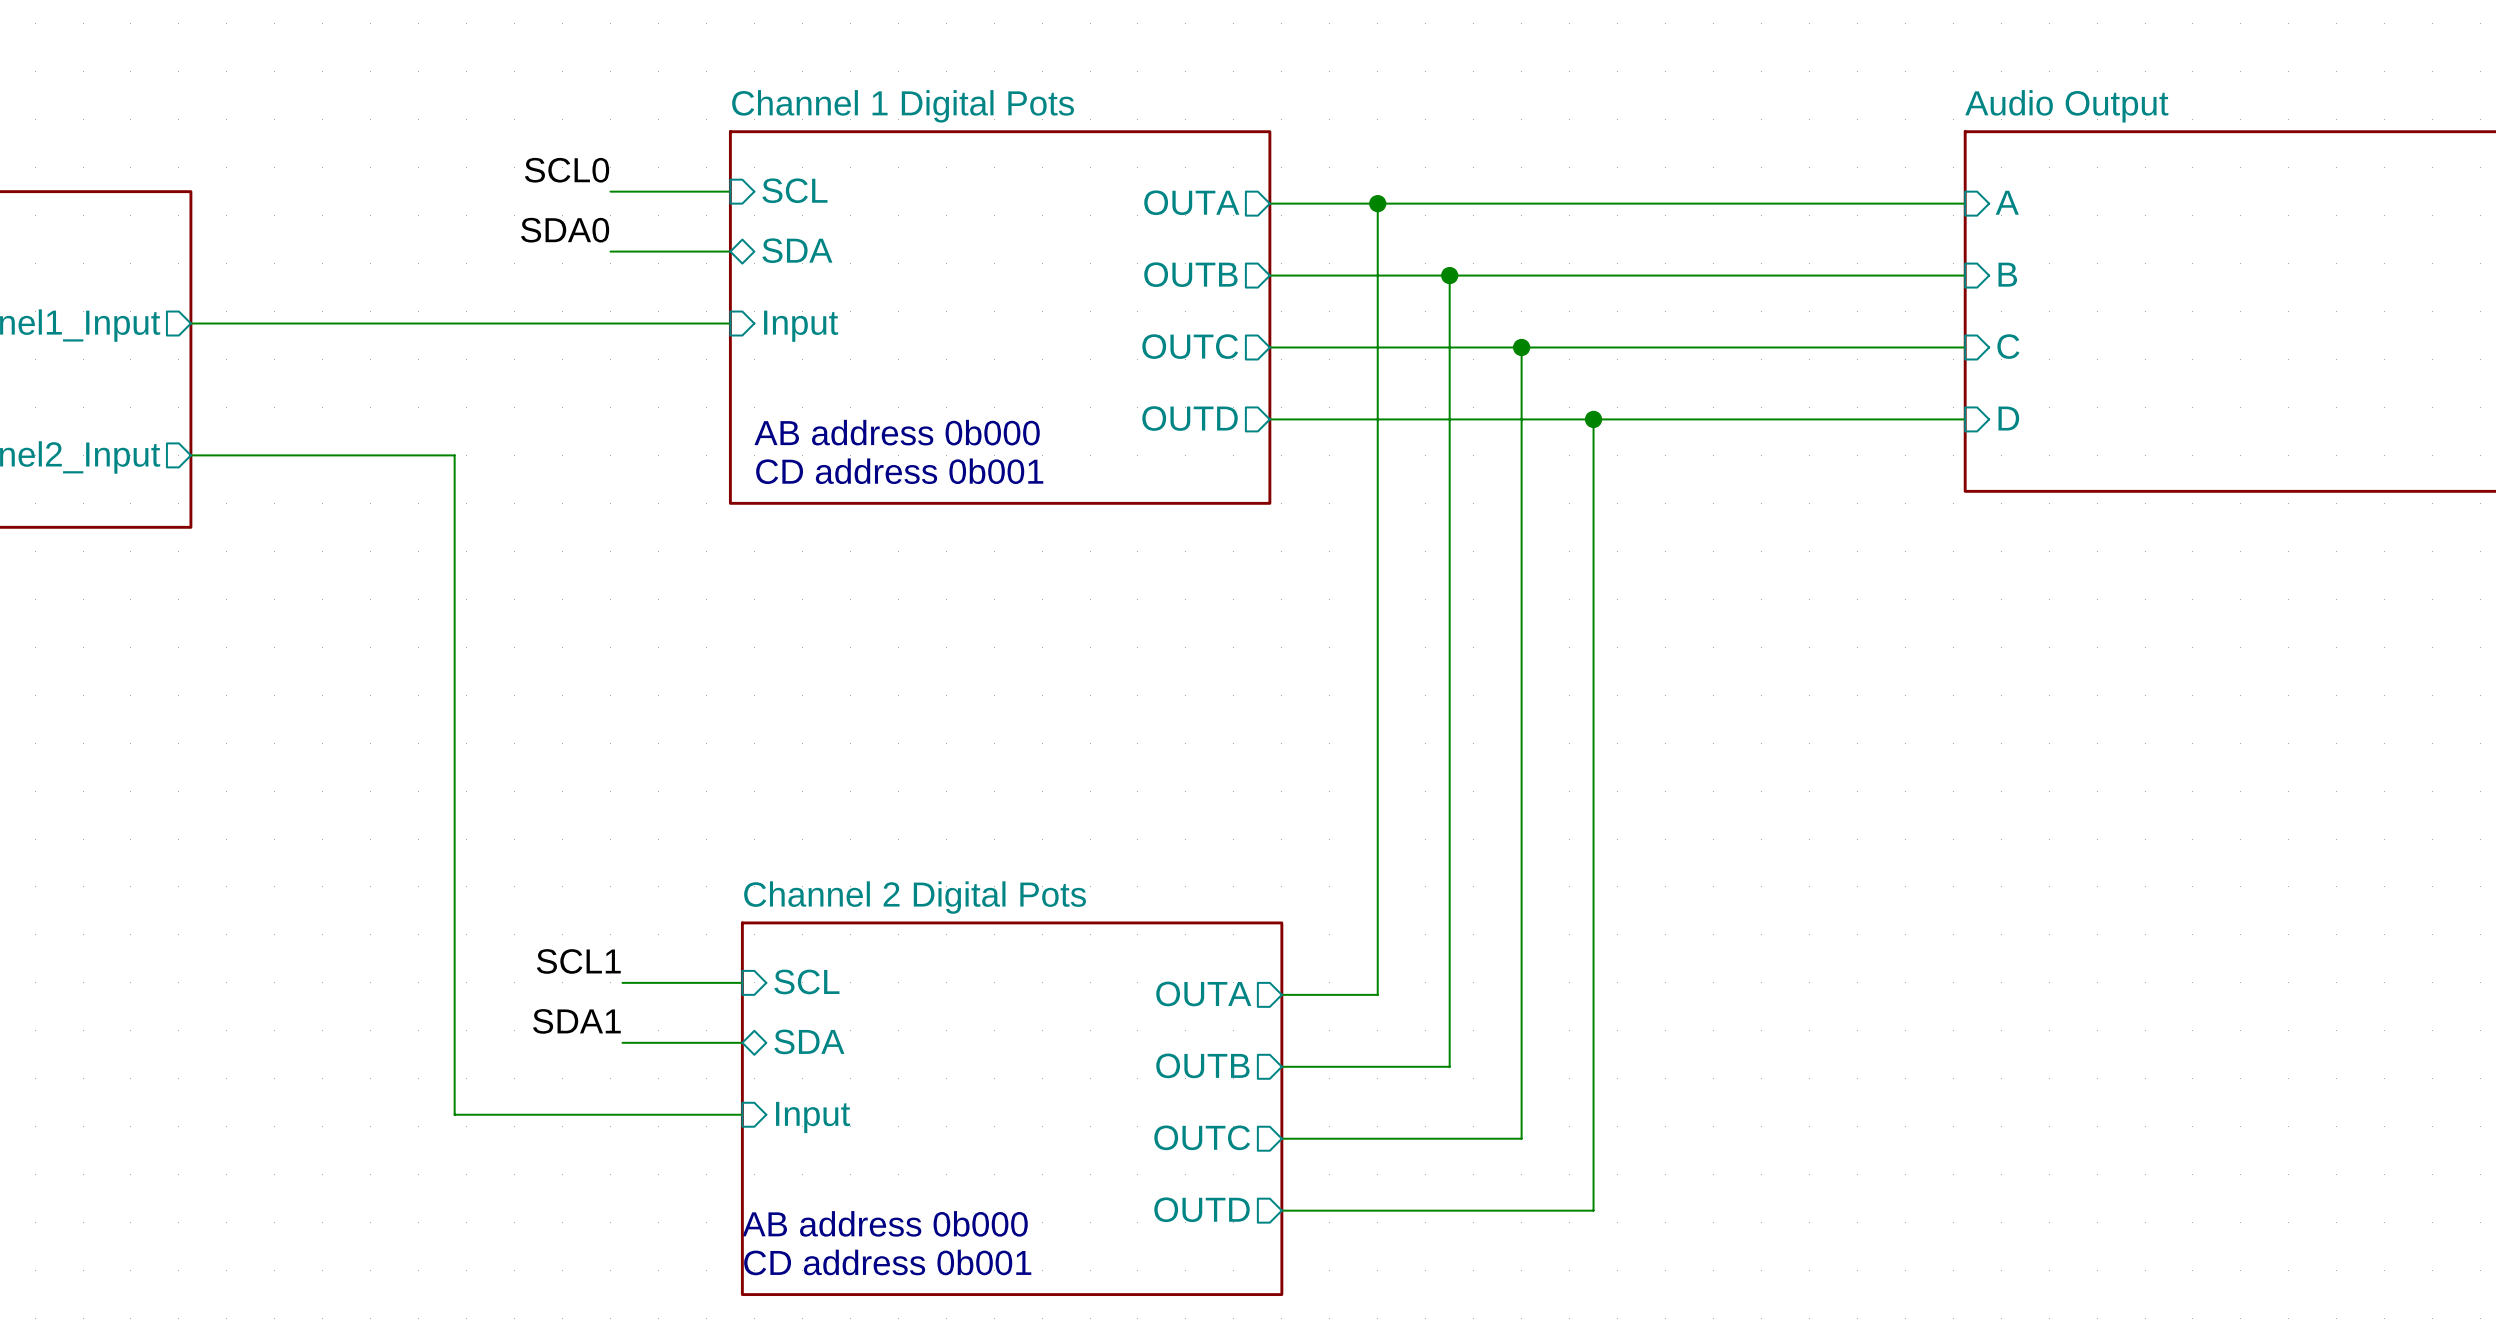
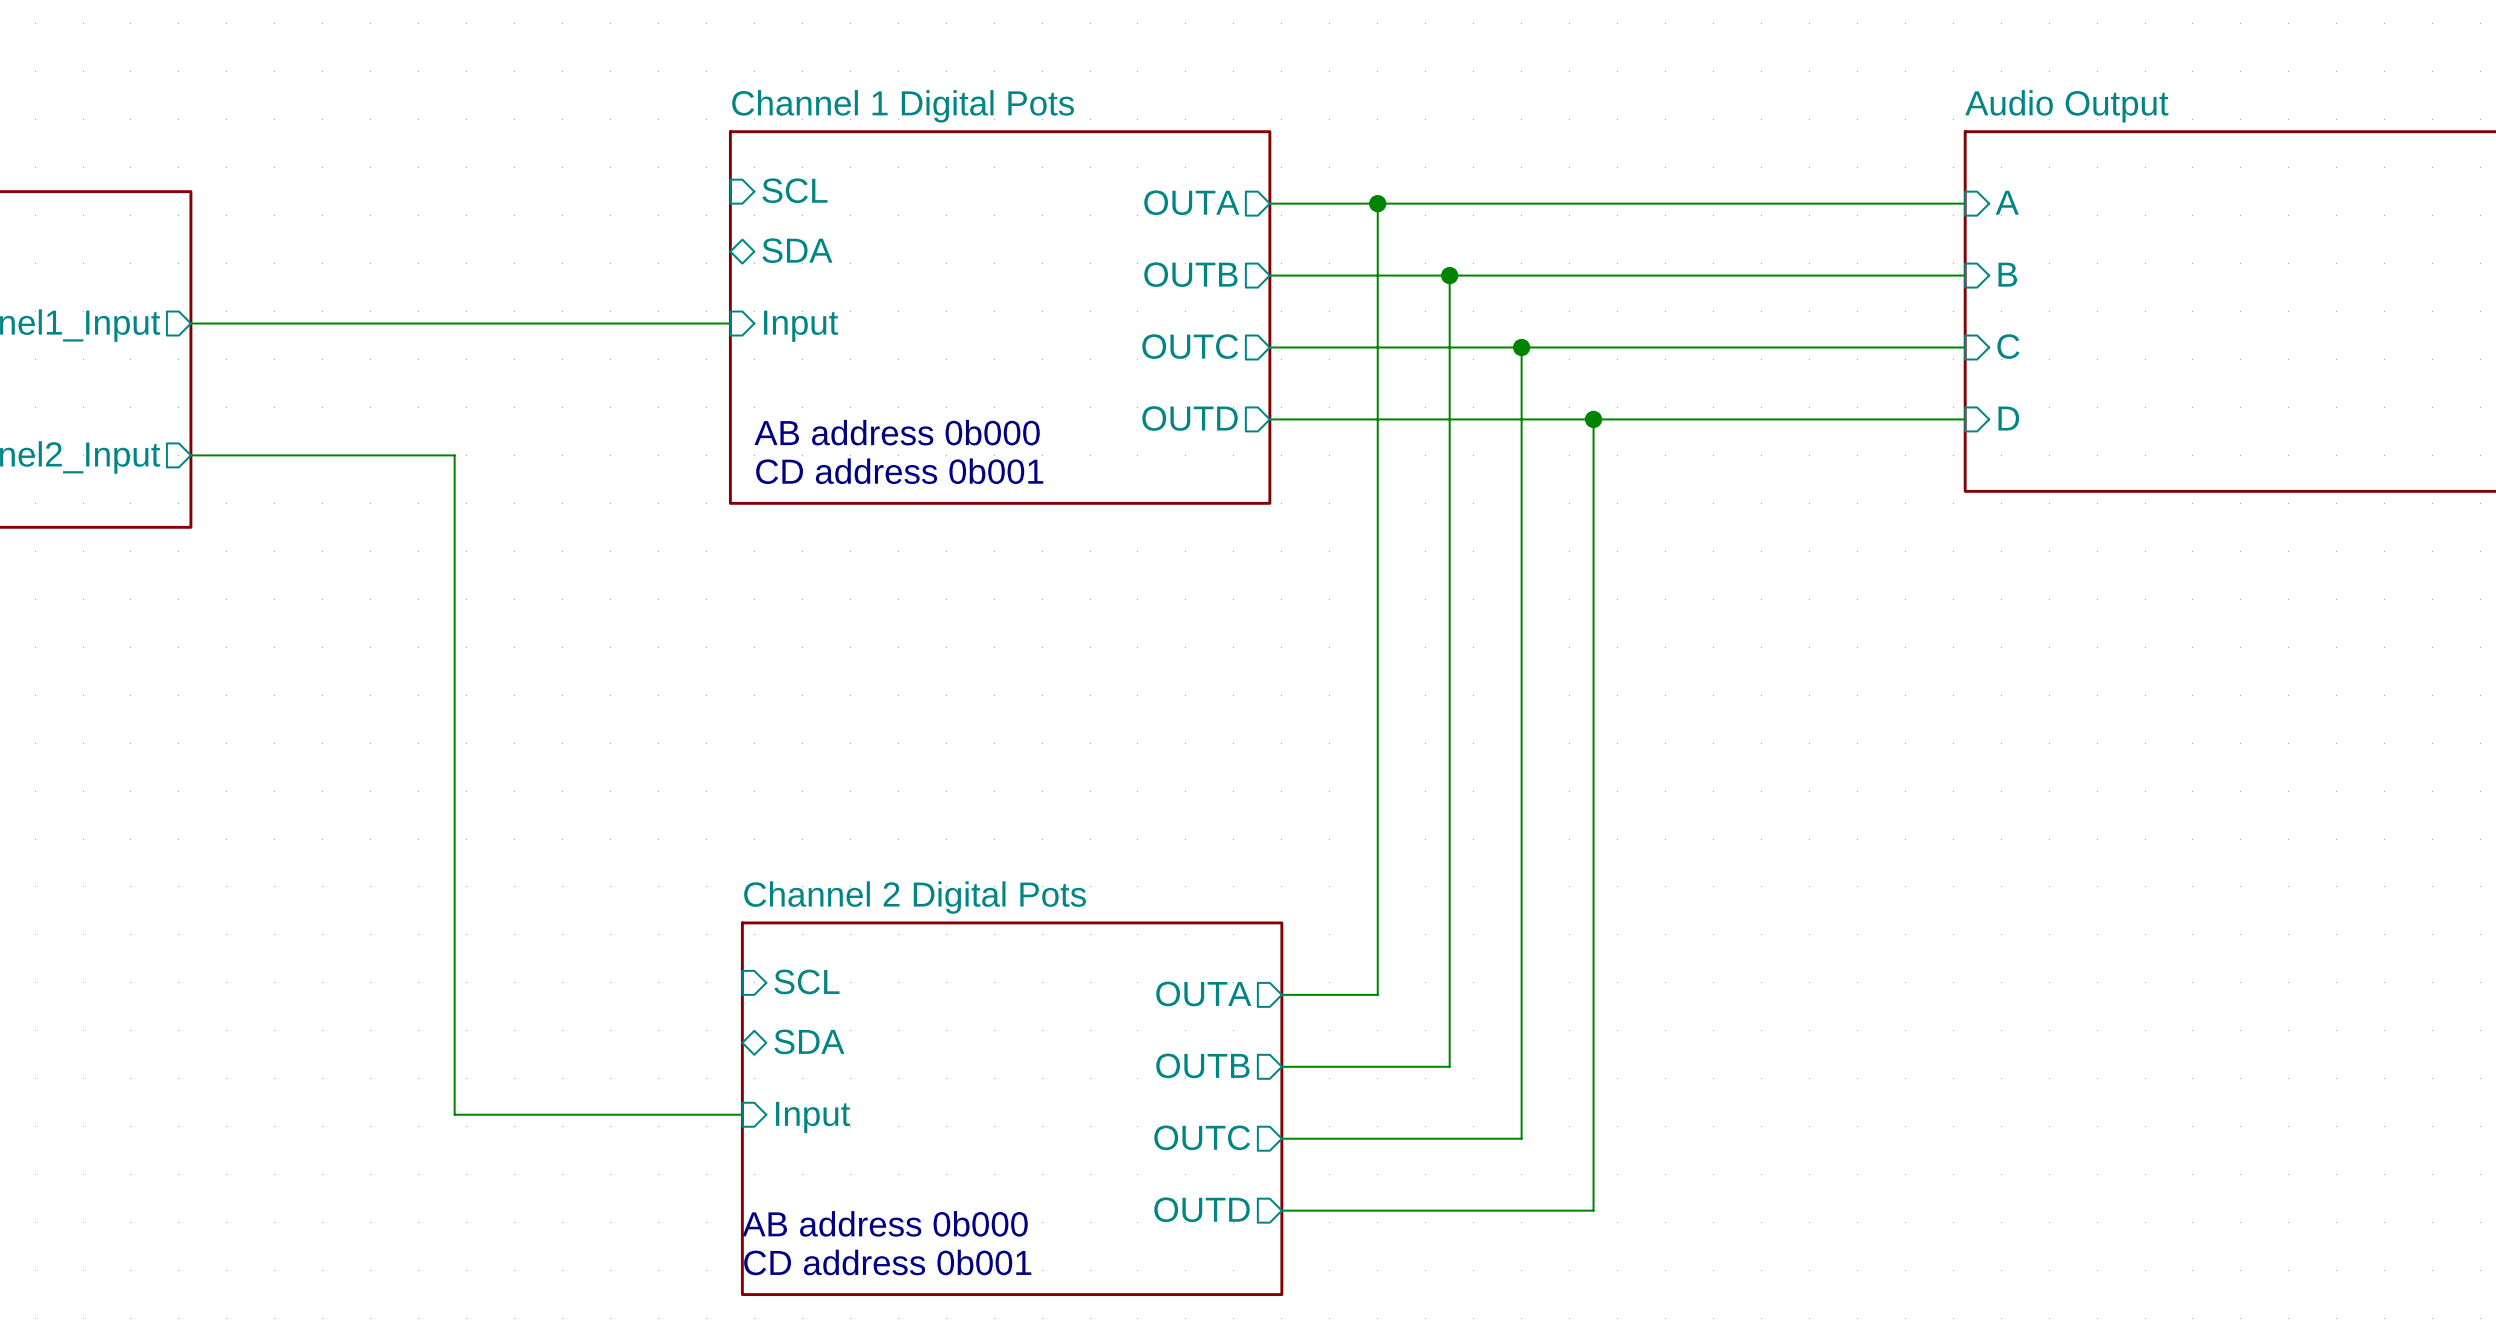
label: SCL0 (567, 170) -> none
wire: (610, 191) (730, 191) -> none
label: SDA0 (565, 230) -> none
wire: (610, 251) (730, 251) -> none
label: SCL1 (578, 961) -> none
wire: (622, 982) (742, 982) -> none
label: SDA1 (576, 1021) -> none
wire: (622, 1042) (742, 1042) -> none

